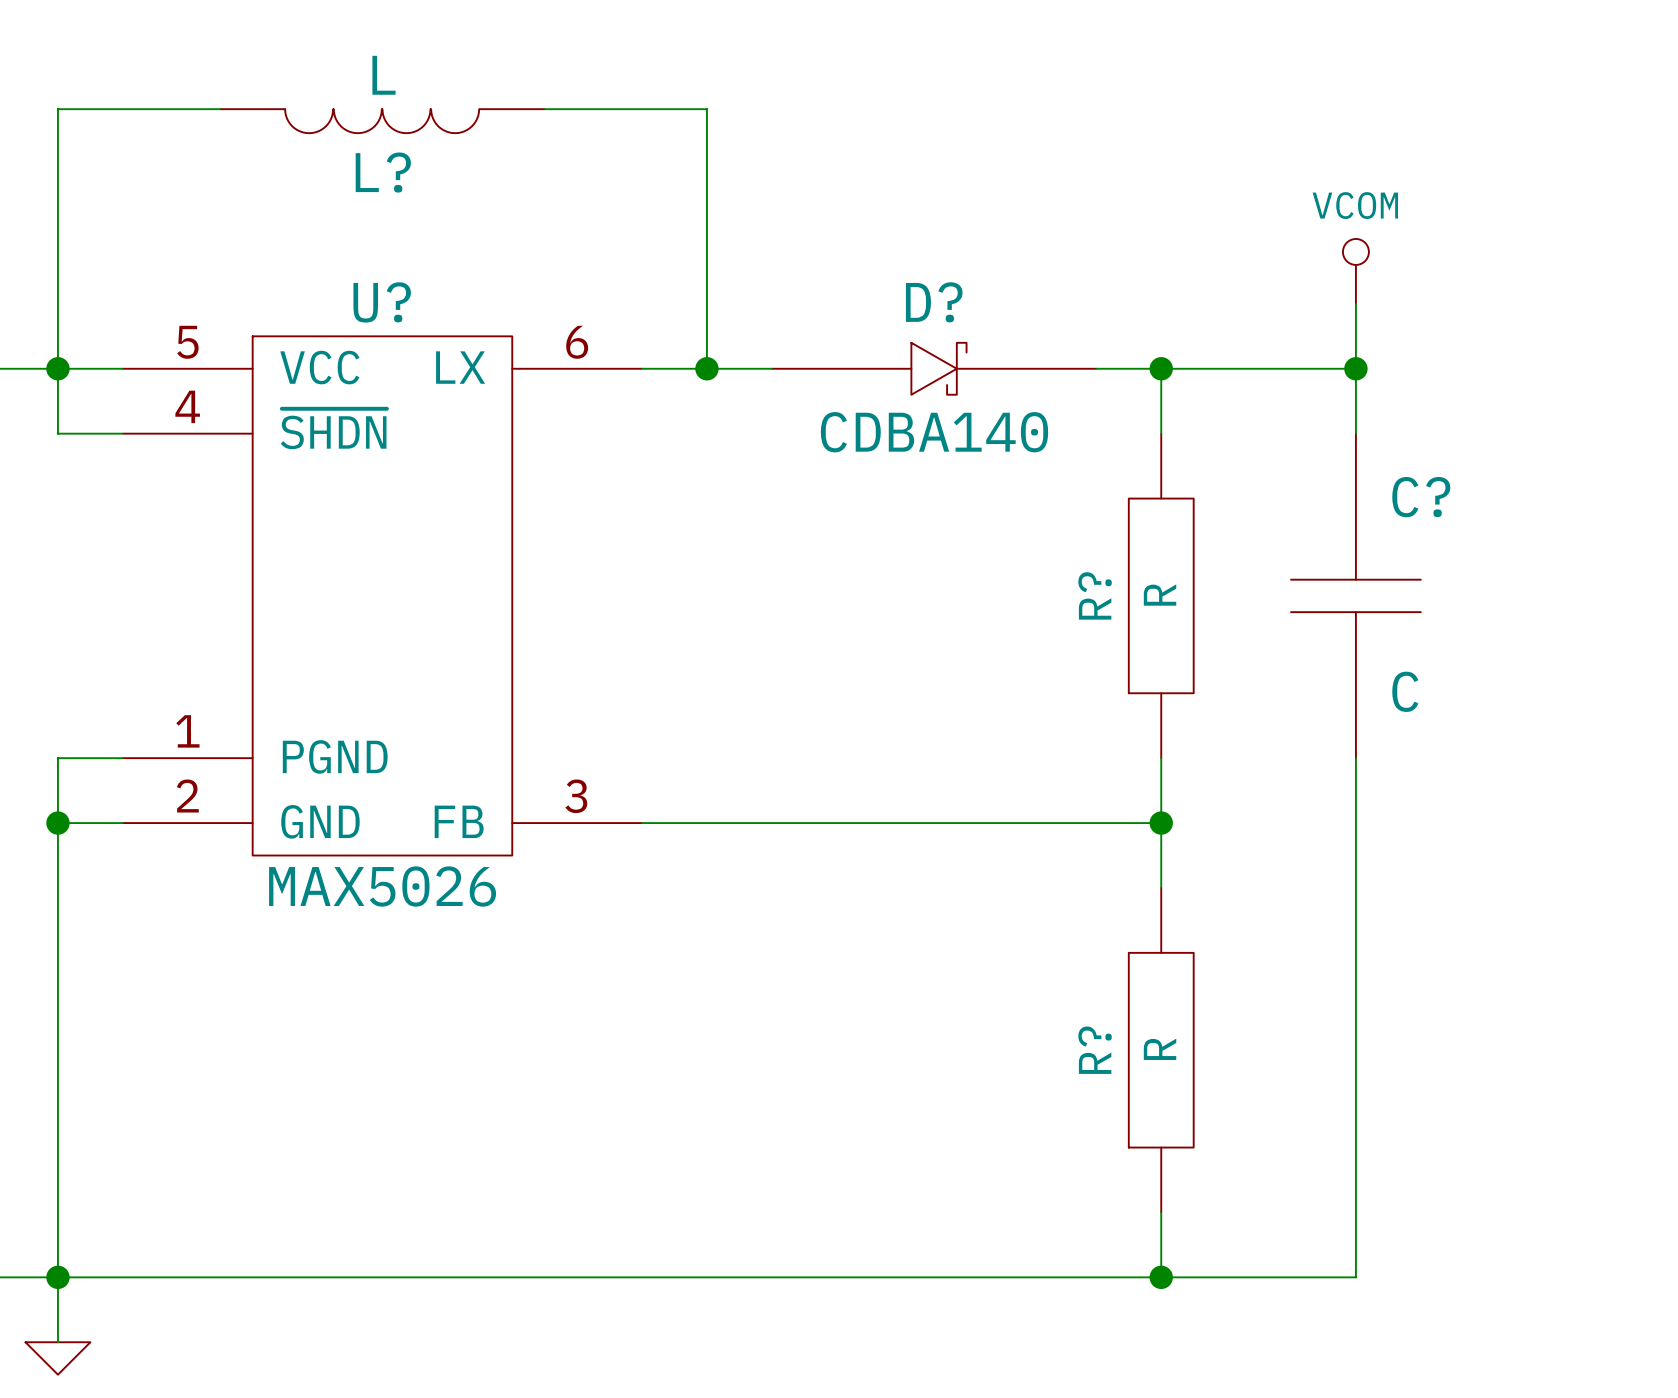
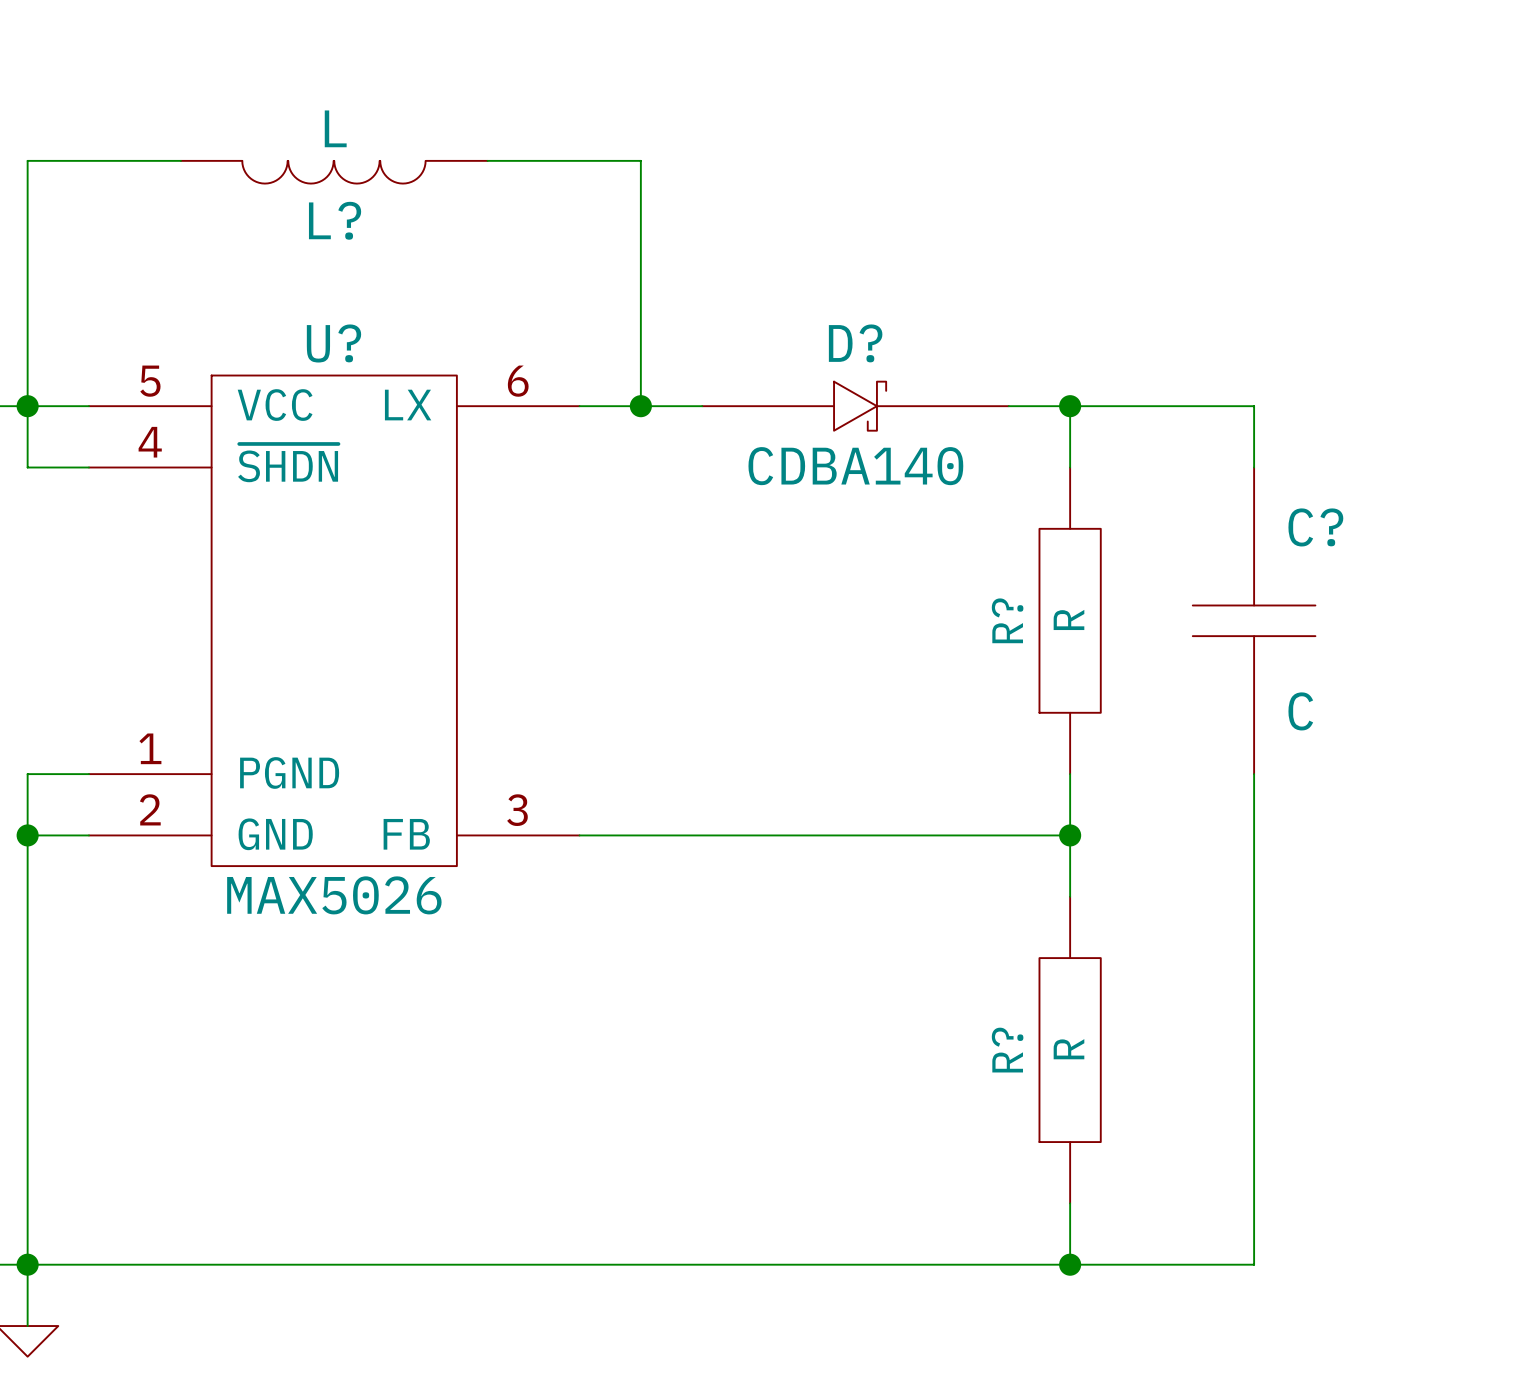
power symbol: VCOM (1355, 271) -> none
wire: (1355, 303) (1355, 368) -> none
junction: (1355, 368) -> none

